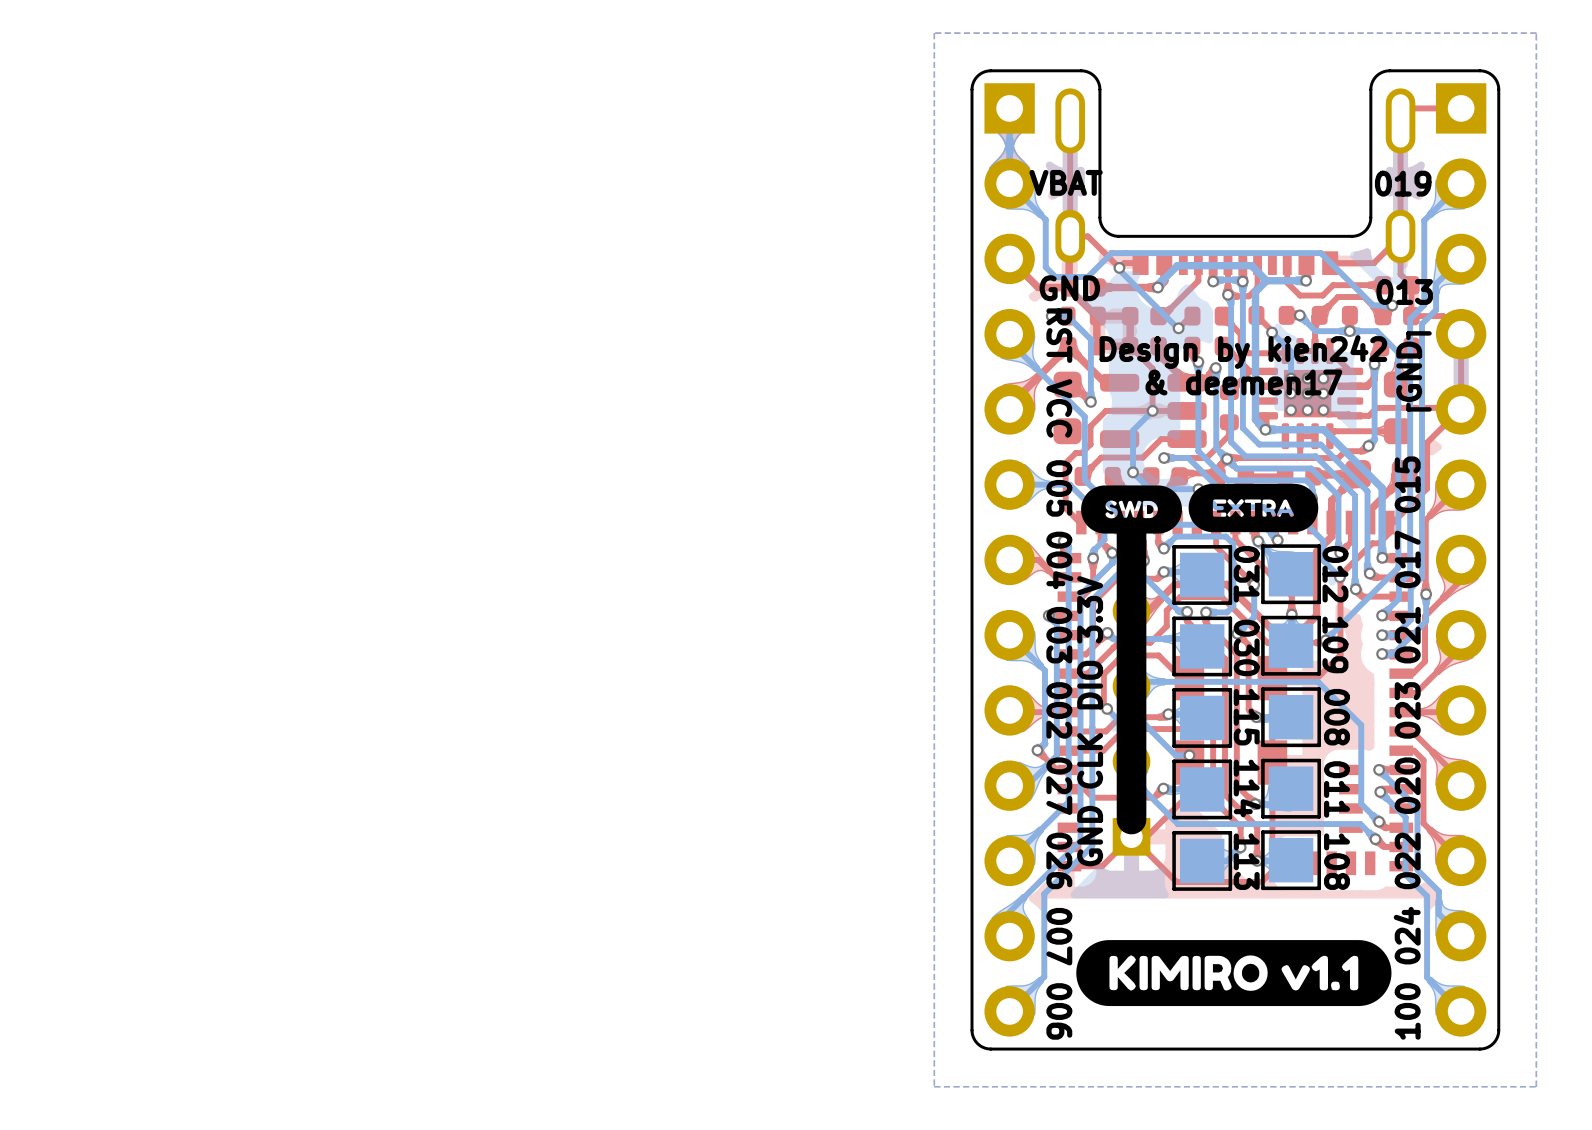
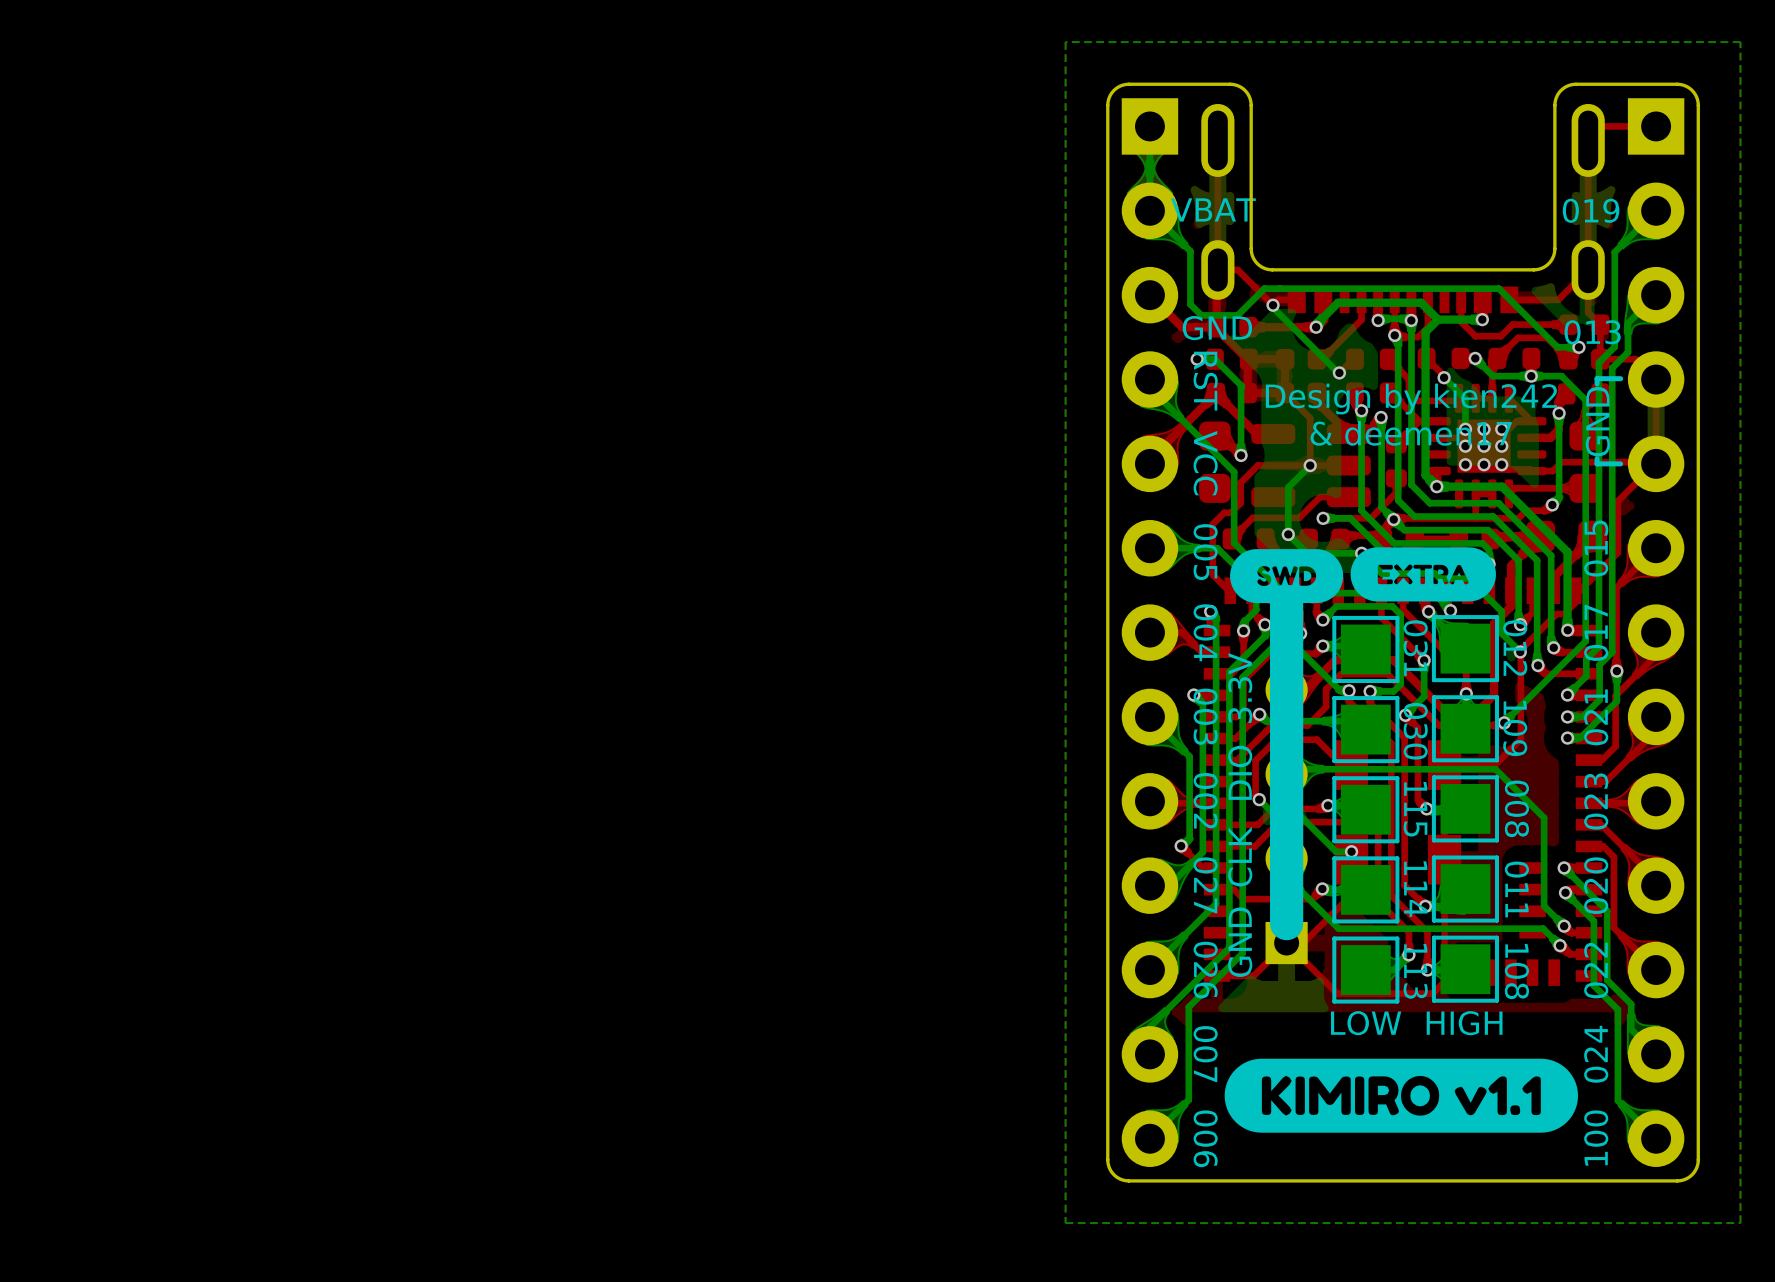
text: none -> LOW (1366, 1023)
text: none -> HIGH (1464, 1023)

